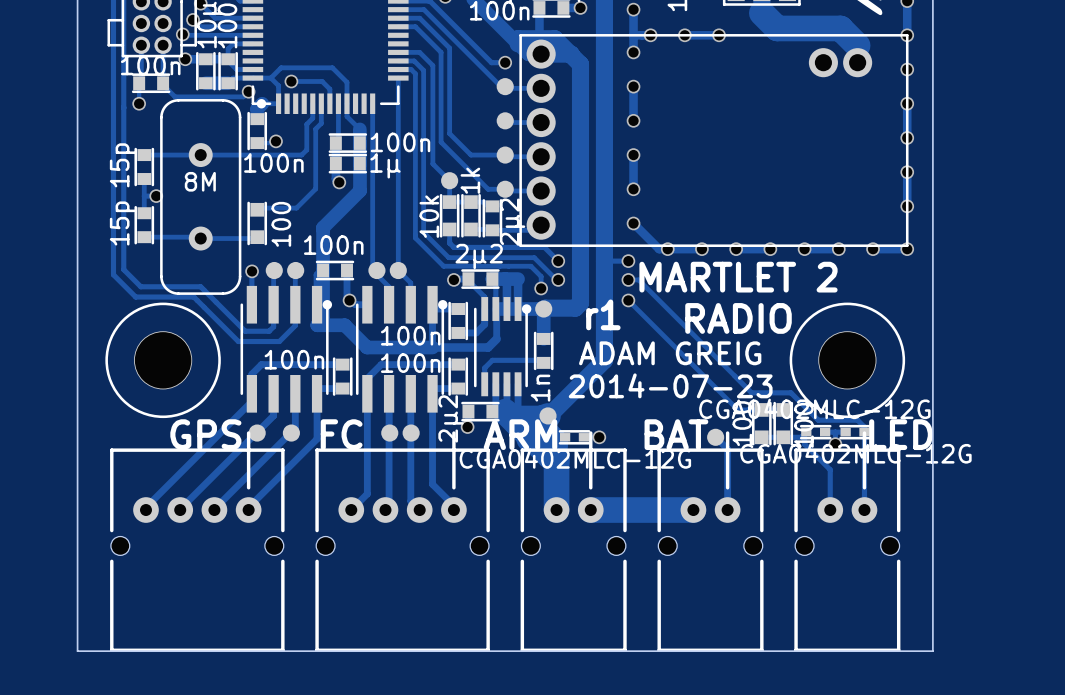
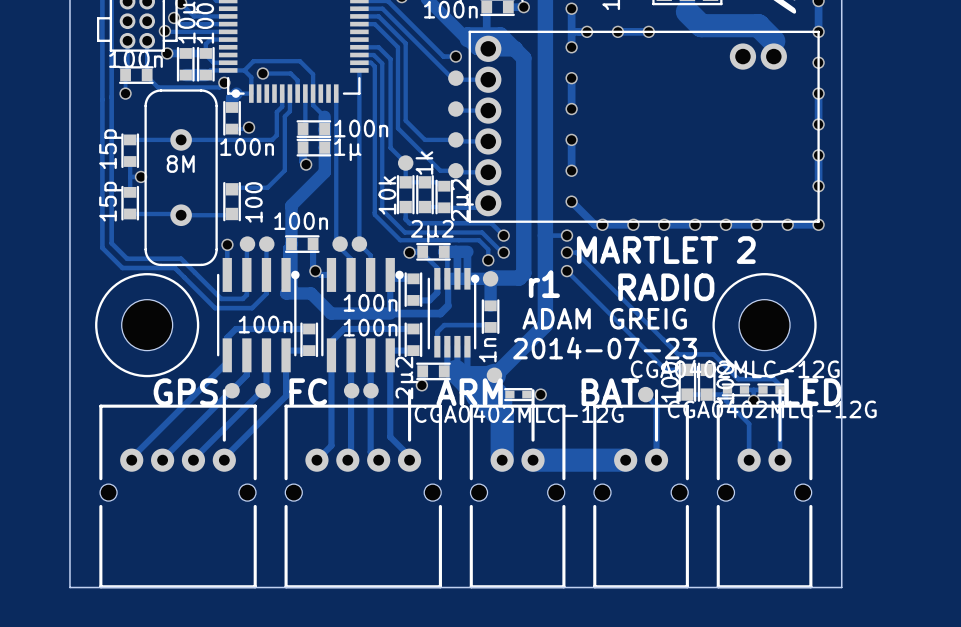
part footprint: [105, 302, 221, 419] -> [95, 273, 200, 378]
part footprint: [789, 302, 906, 419] -> [712, 273, 817, 378]

